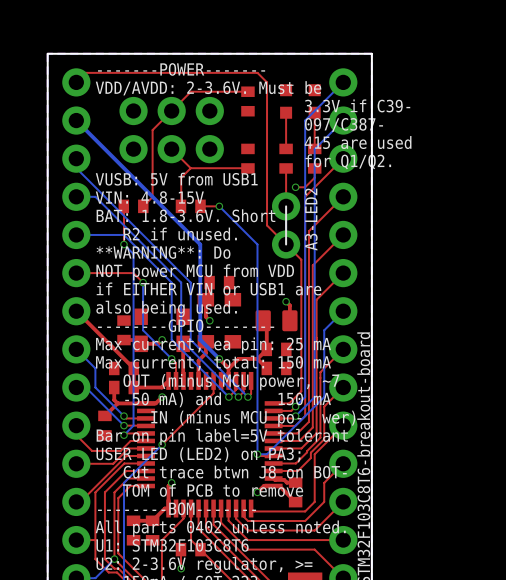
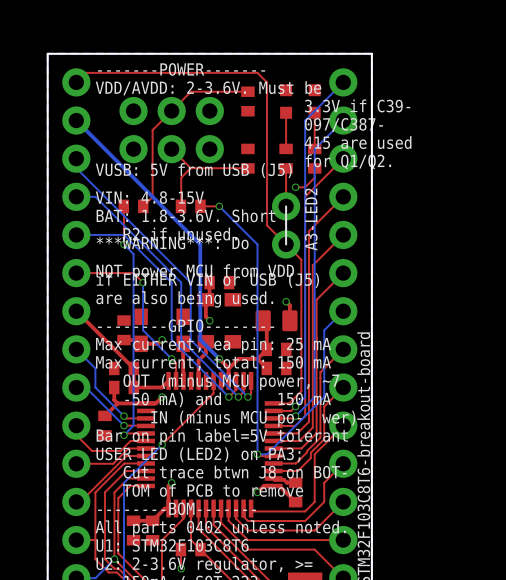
text: VUSB: 5V from USB1 (176, 179) -> VUSB: 5V from USB (J5) (193, 170)
text: **WARNING**: Do (163, 252) -> ***WARNING***: Do (172, 242)
text: if EITHER VIN or USB1 are (208, 288) -> if EITHER VIN or USB (J5) (207, 280)
text: also being used. (166, 308) -> are also being used. (184, 299)

